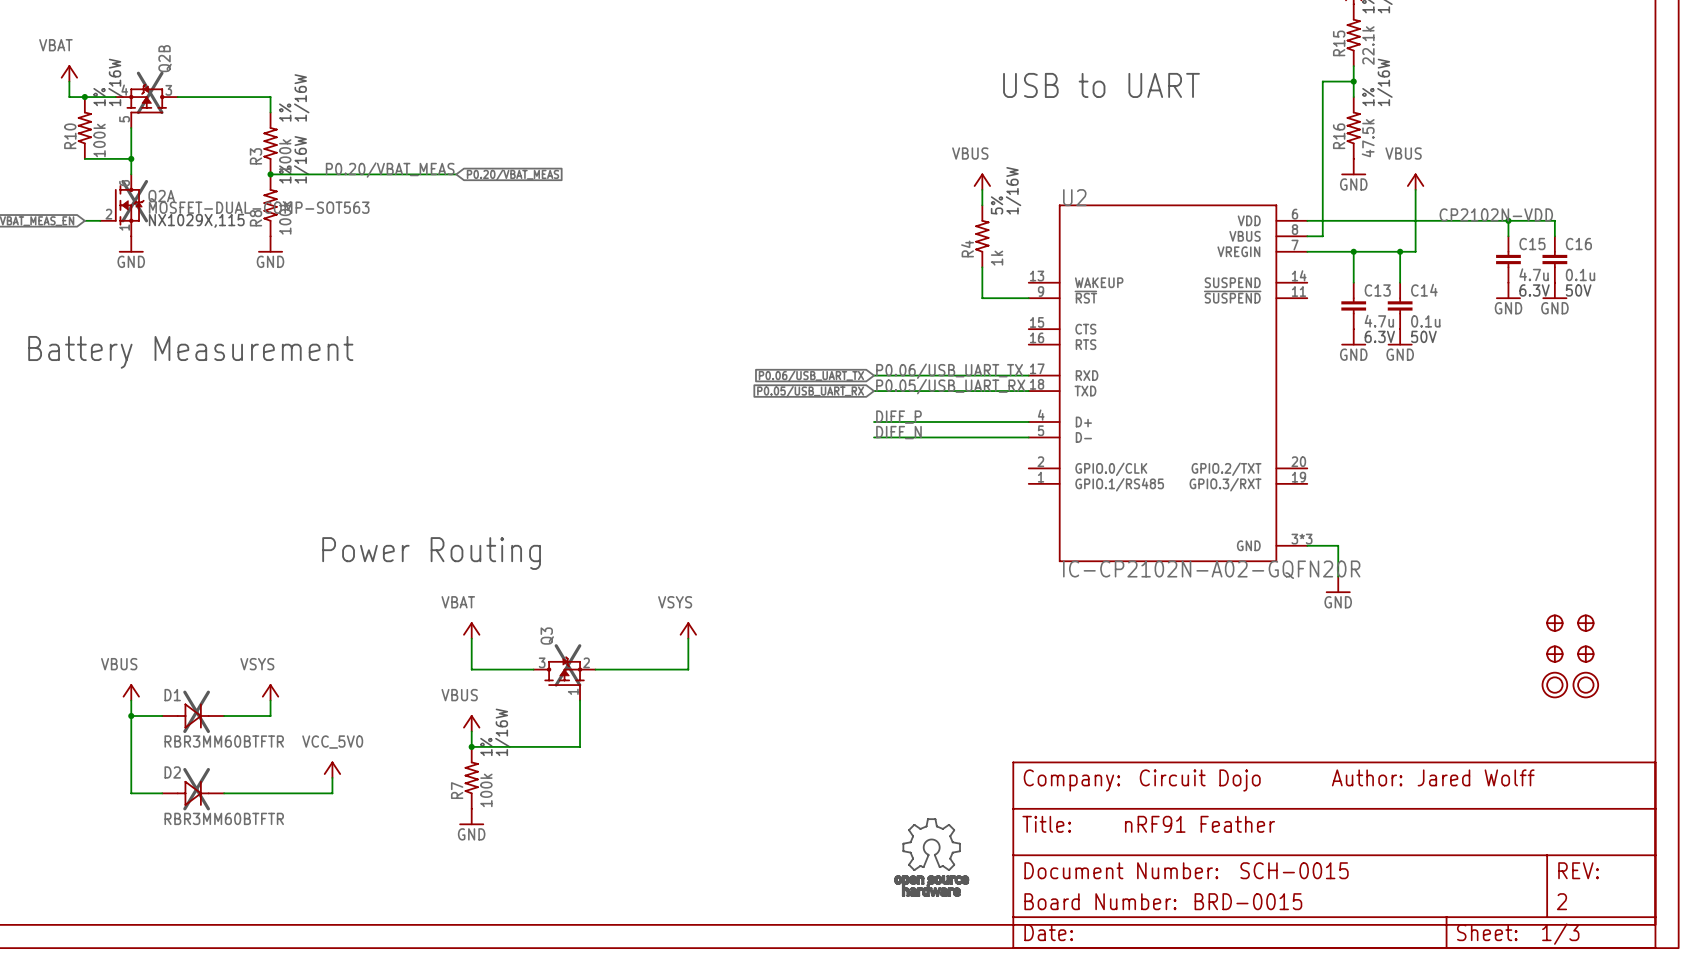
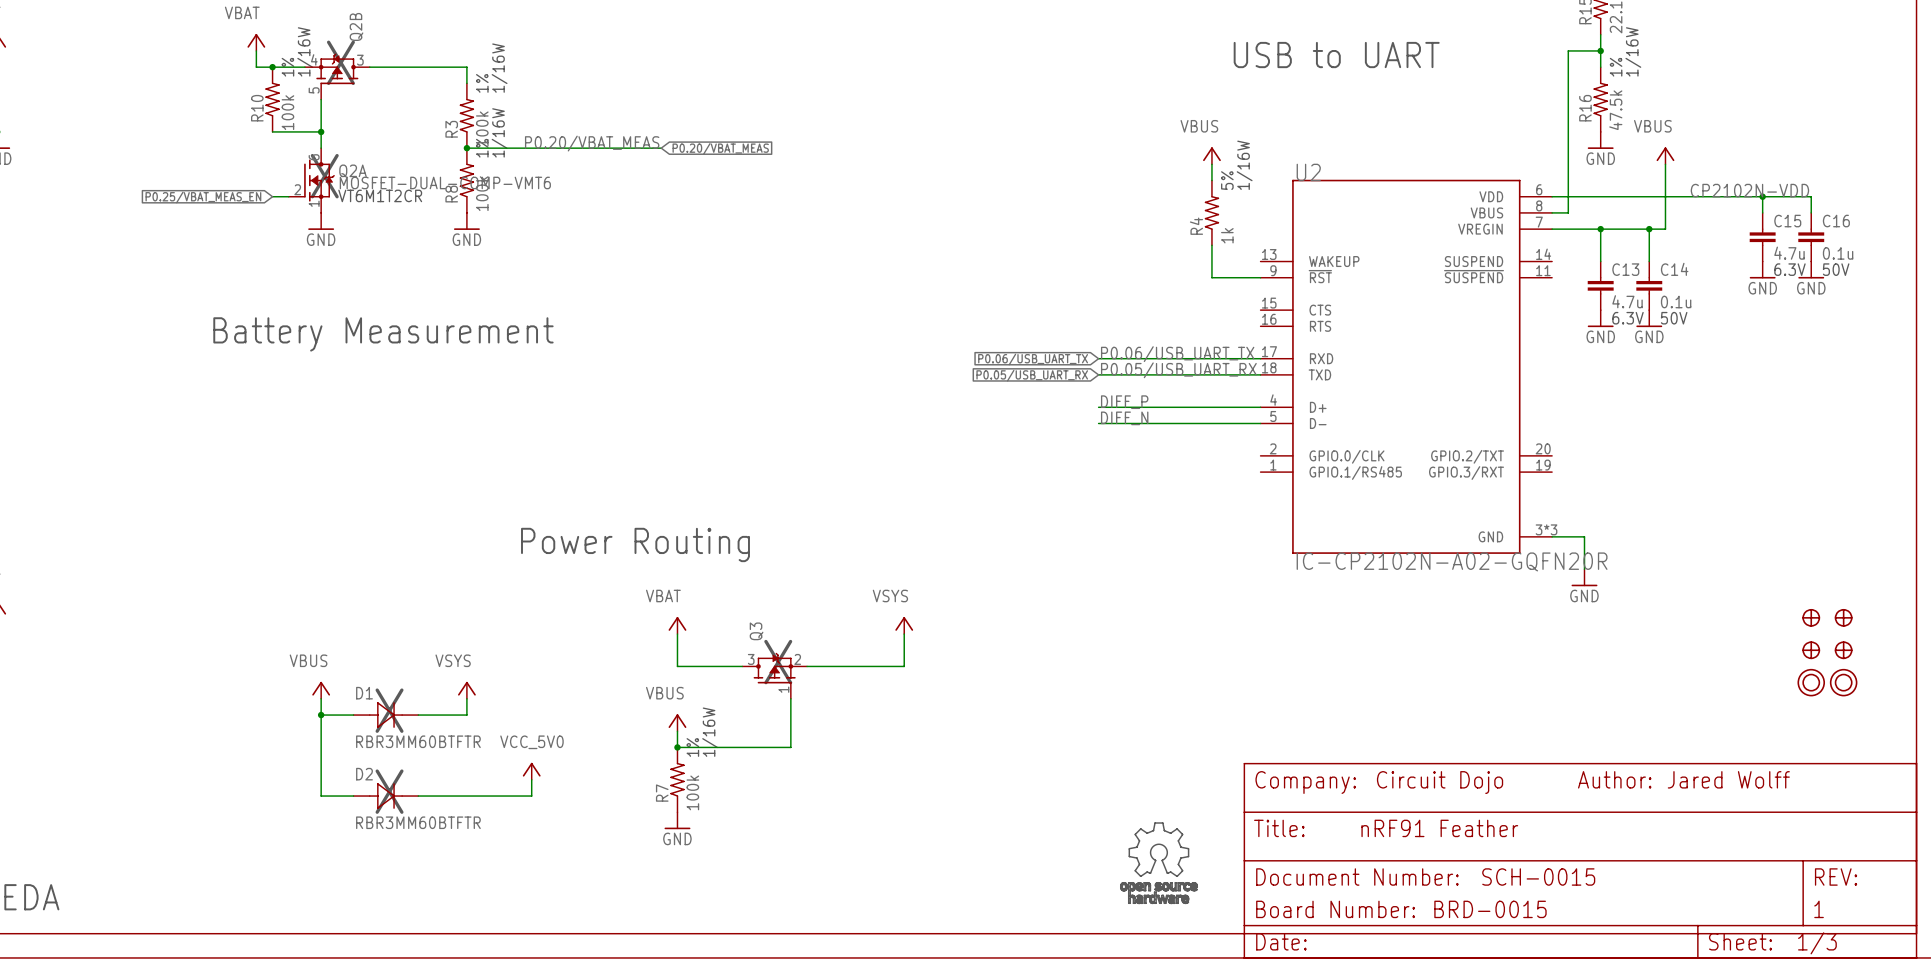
Q2A value: MOSFET-DUAL-COMP-SOT563 (259, 207) -> MOSFET-DUAL-COMP-VMT6 (445, 182)
Q2A text: NX1029X,115 (196, 220) -> VT6M1T2CR (380, 195)
part text: 2 (1561, 901) -> 1 (1819, 909)

